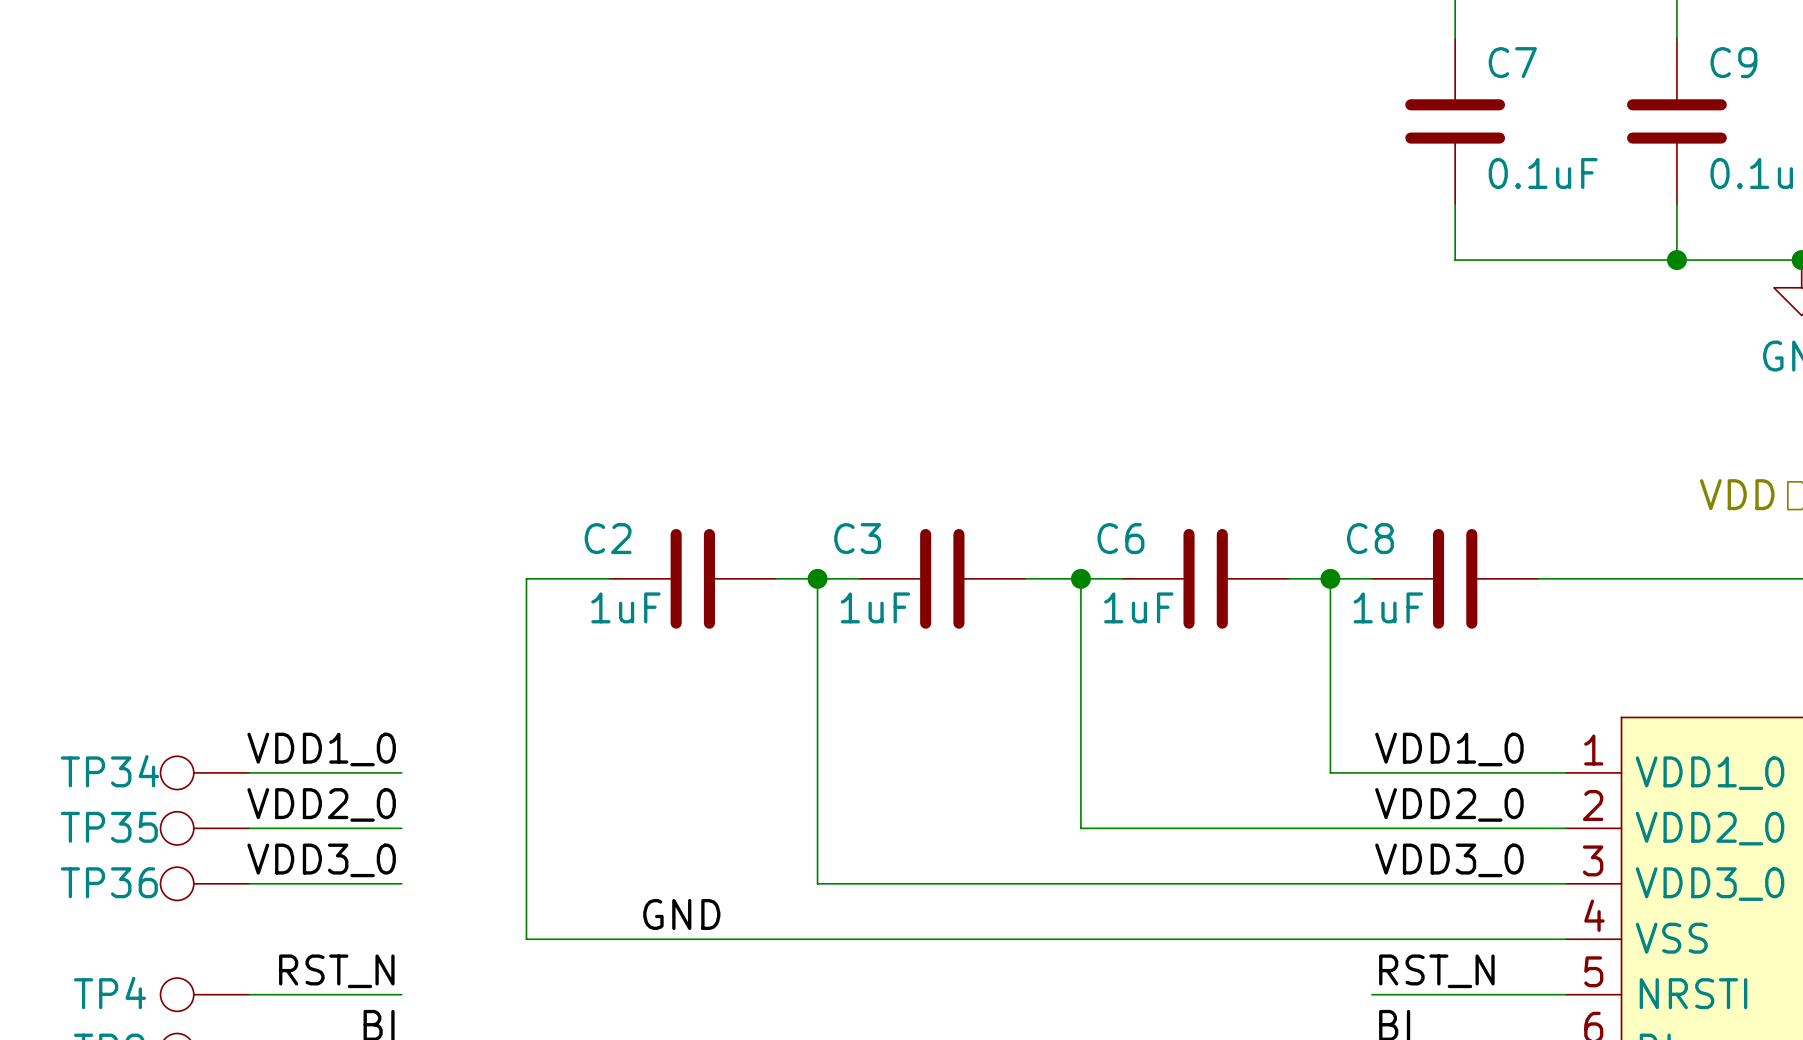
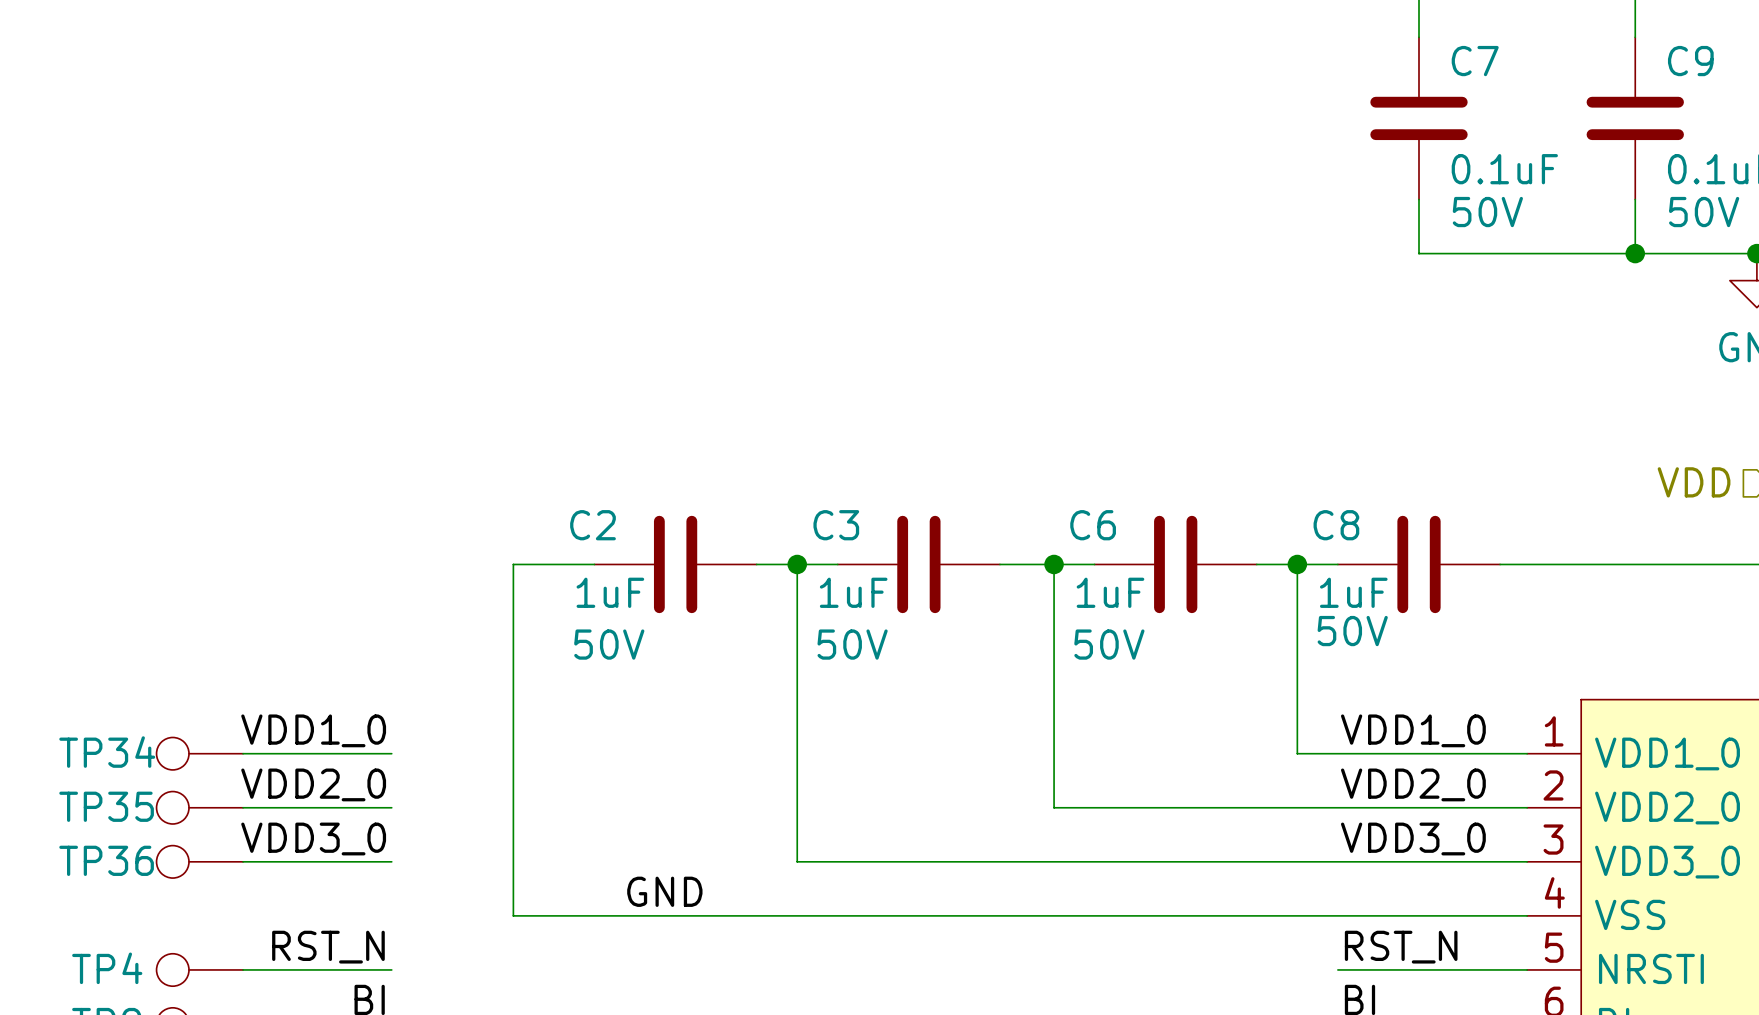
C7 text: none -> 50V (1487, 212)
C9 text: none -> 50V (1704, 212)
C8 text: none -> 50V (1352, 631)
C2 text: none -> 50V (609, 644)
C3 text: none -> 50V (852, 644)
C6 text: none -> 50V (1109, 644)

